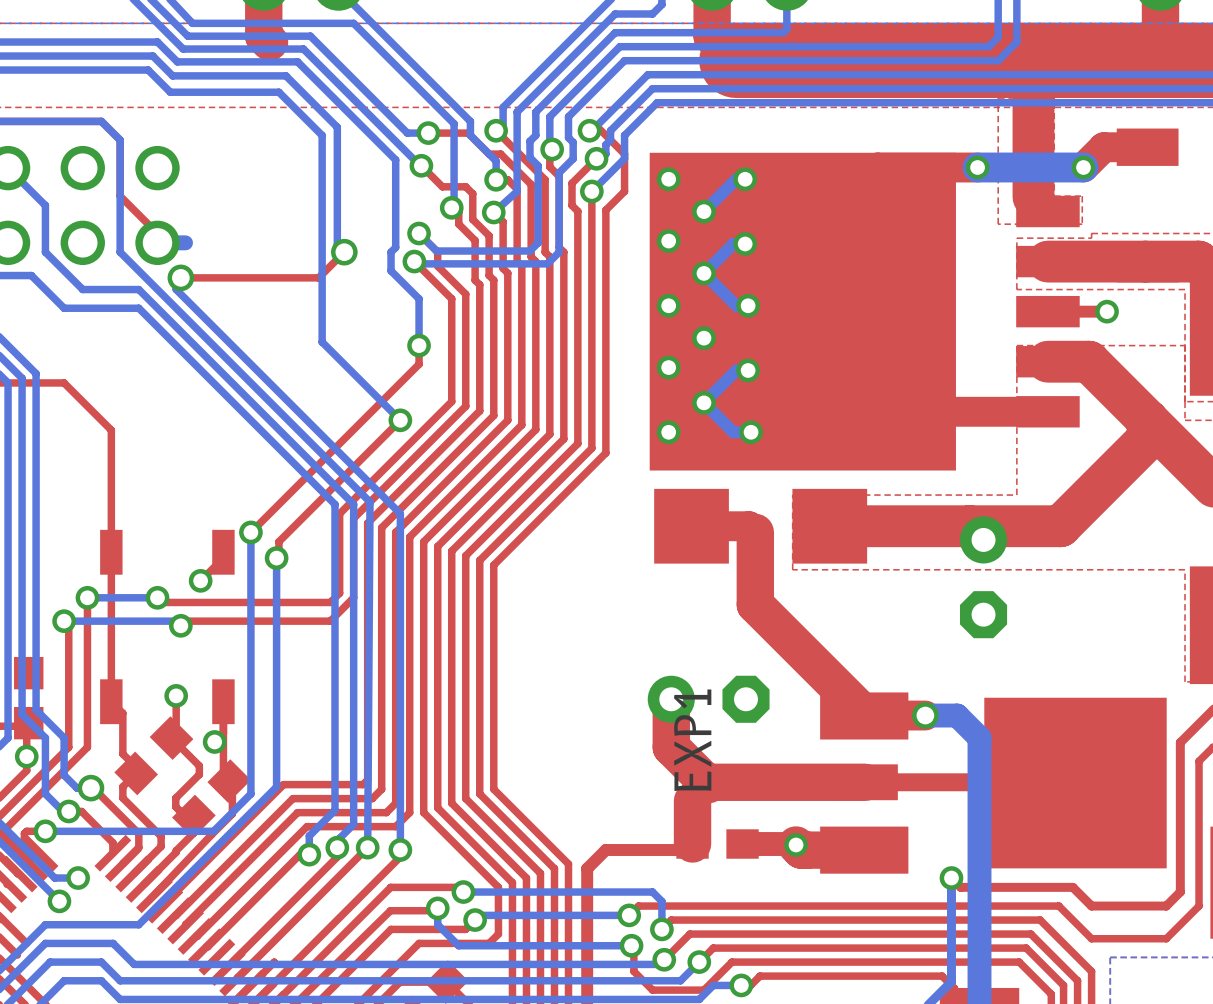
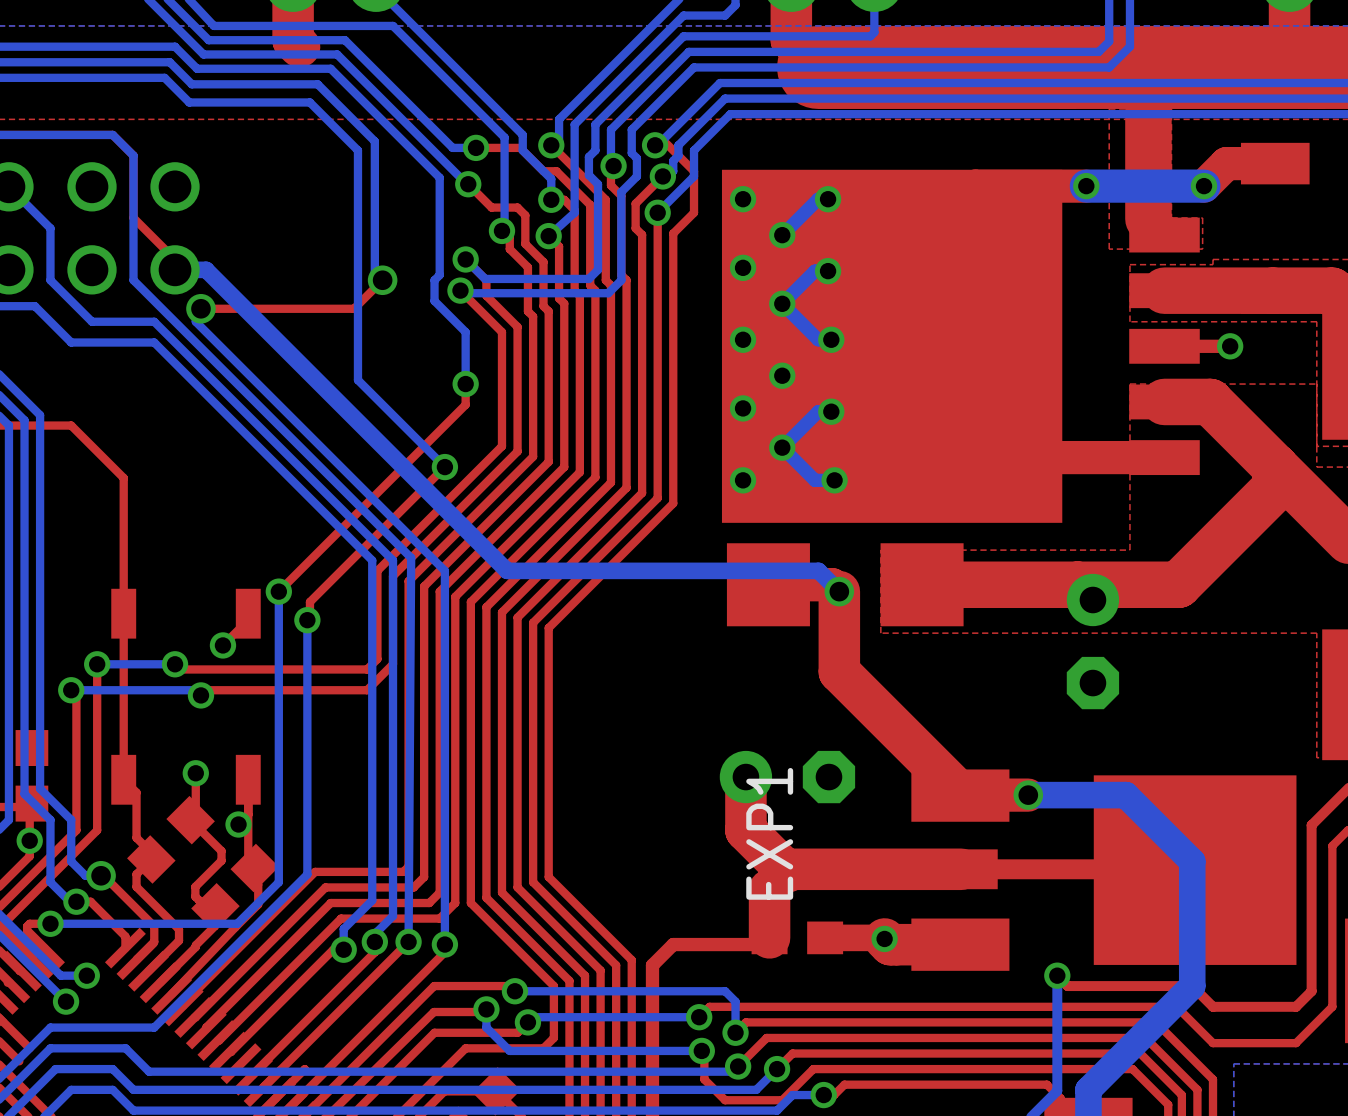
bottom track: none -> (206, 269) (507, 570) (818, 570) (839, 591)
via: none -> (839, 591)
bottom track: (957, 715) (979, 737) (979, 980) -> (1063, 795) (1125, 795) (1192, 861) (1192, 986) (1088, 1089)

